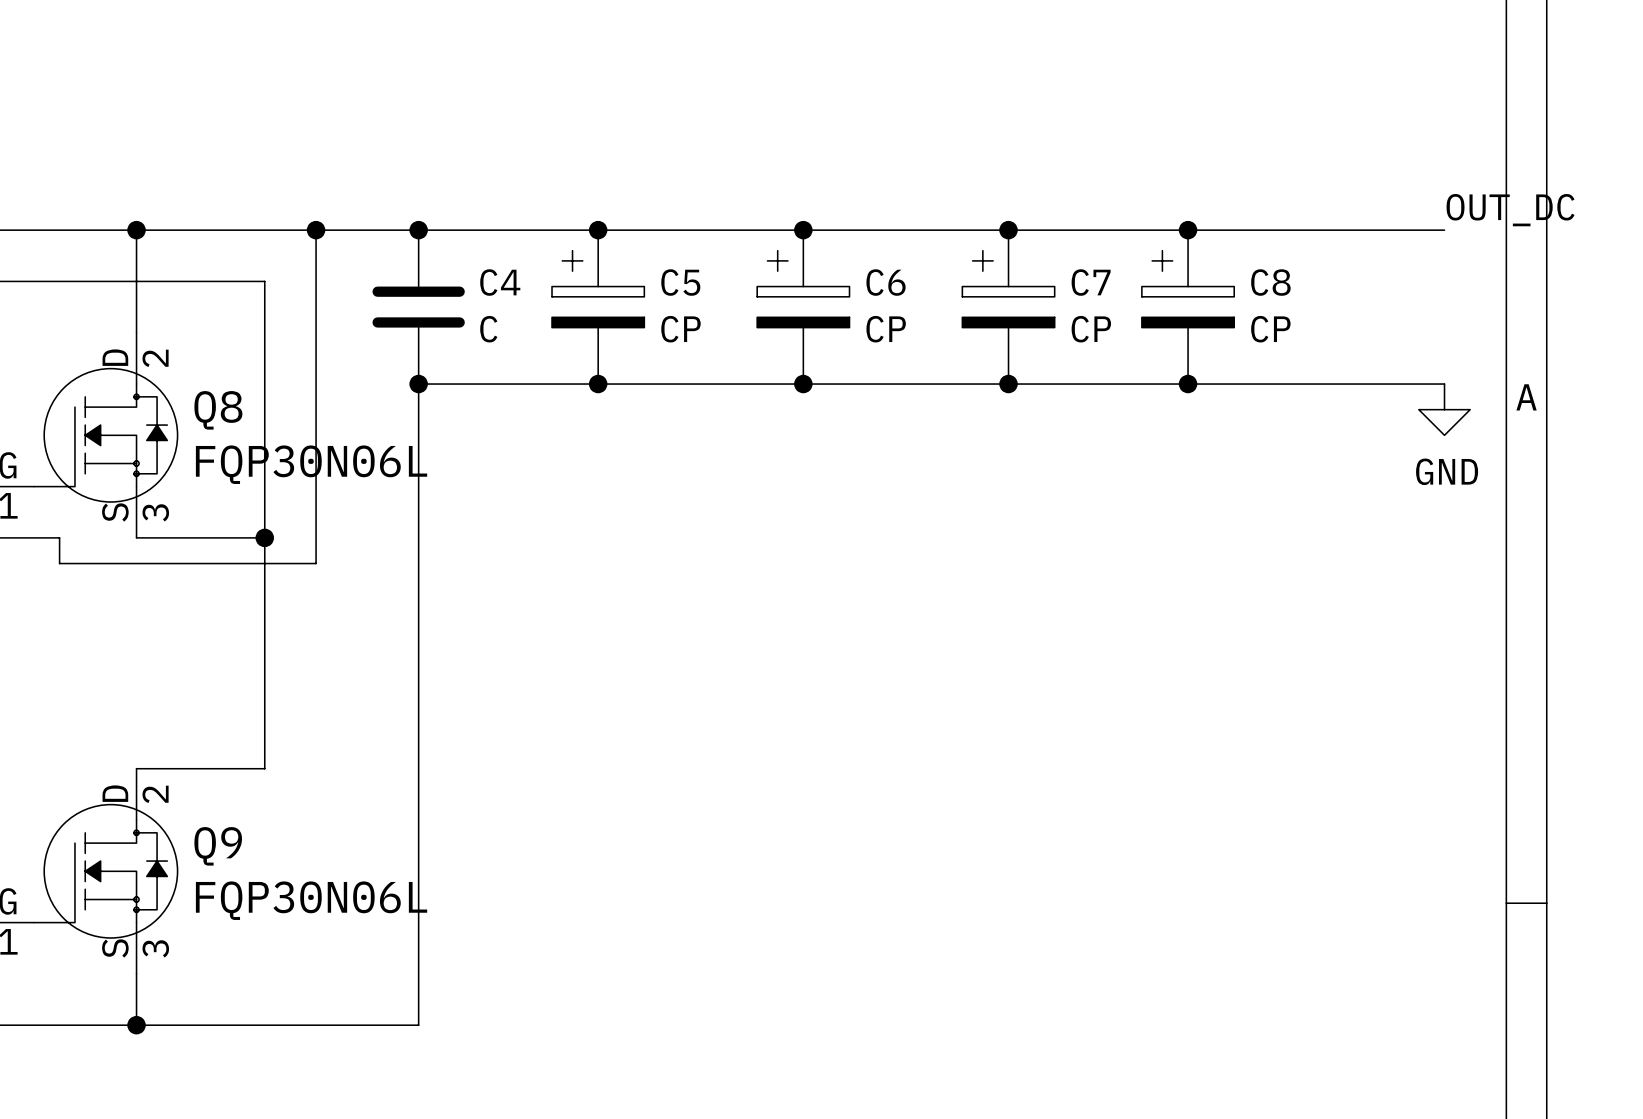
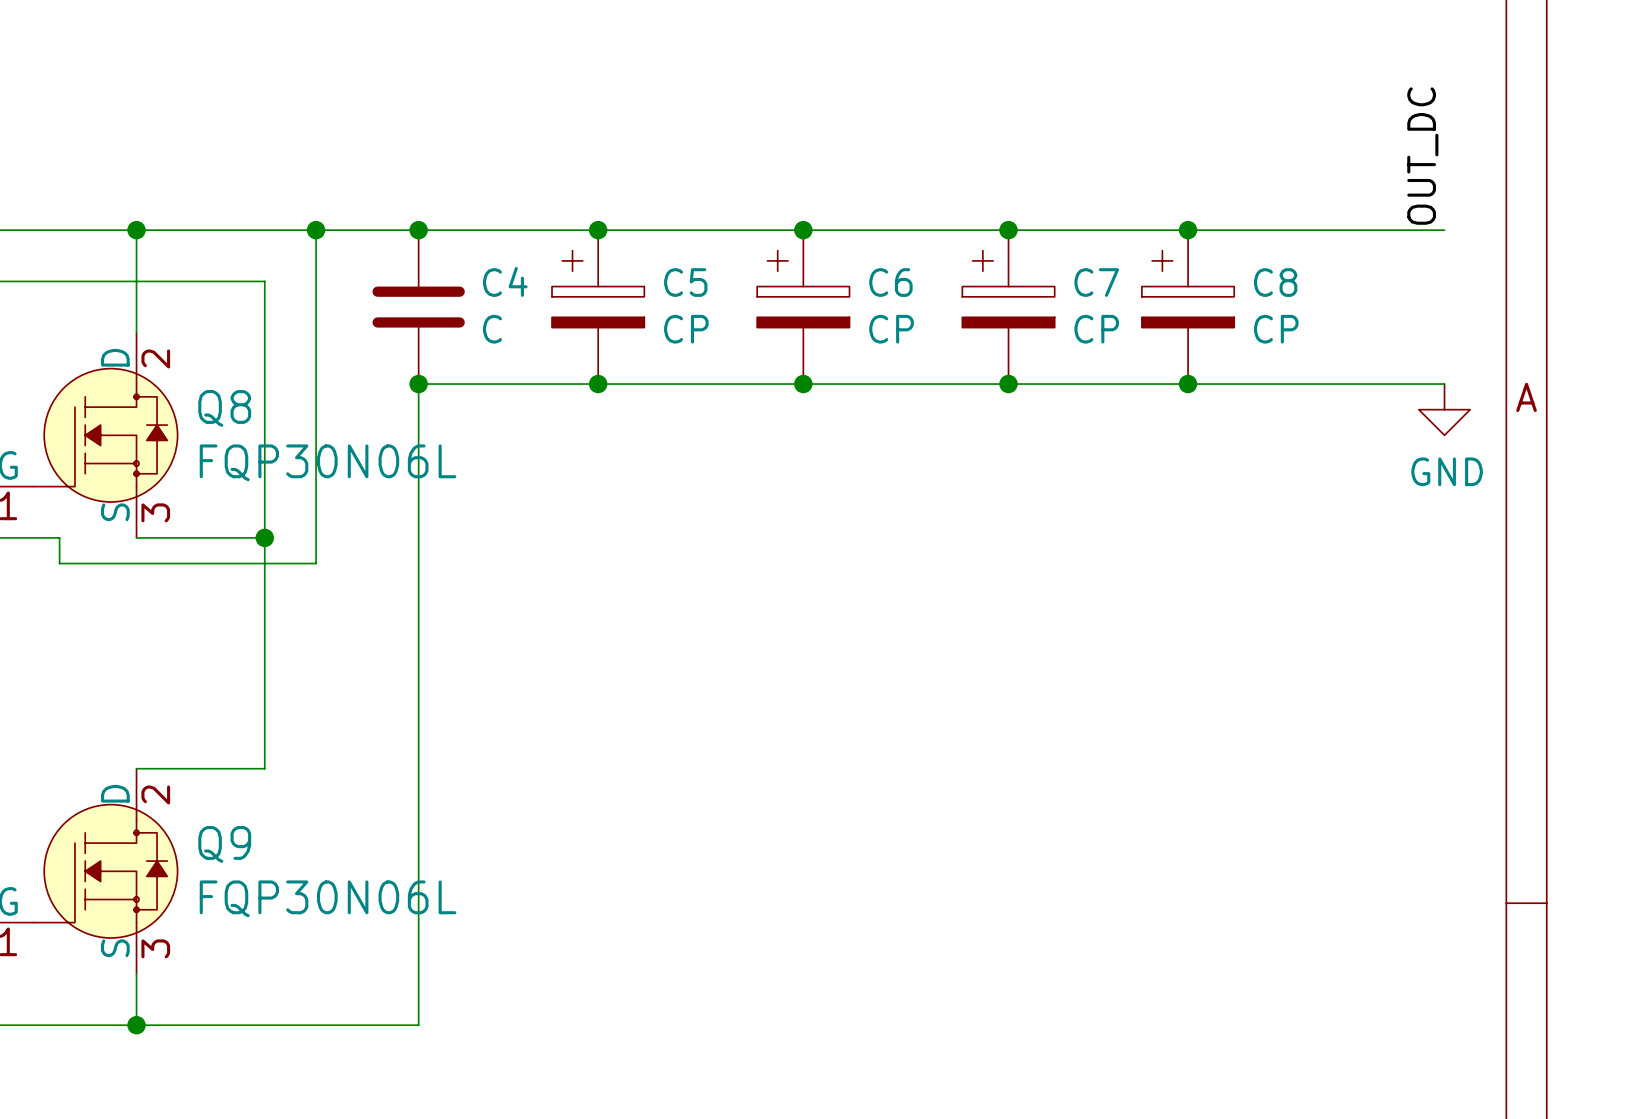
label rotation: 0° (1510, 210) -> 90° counterclockwise (1422, 156)

